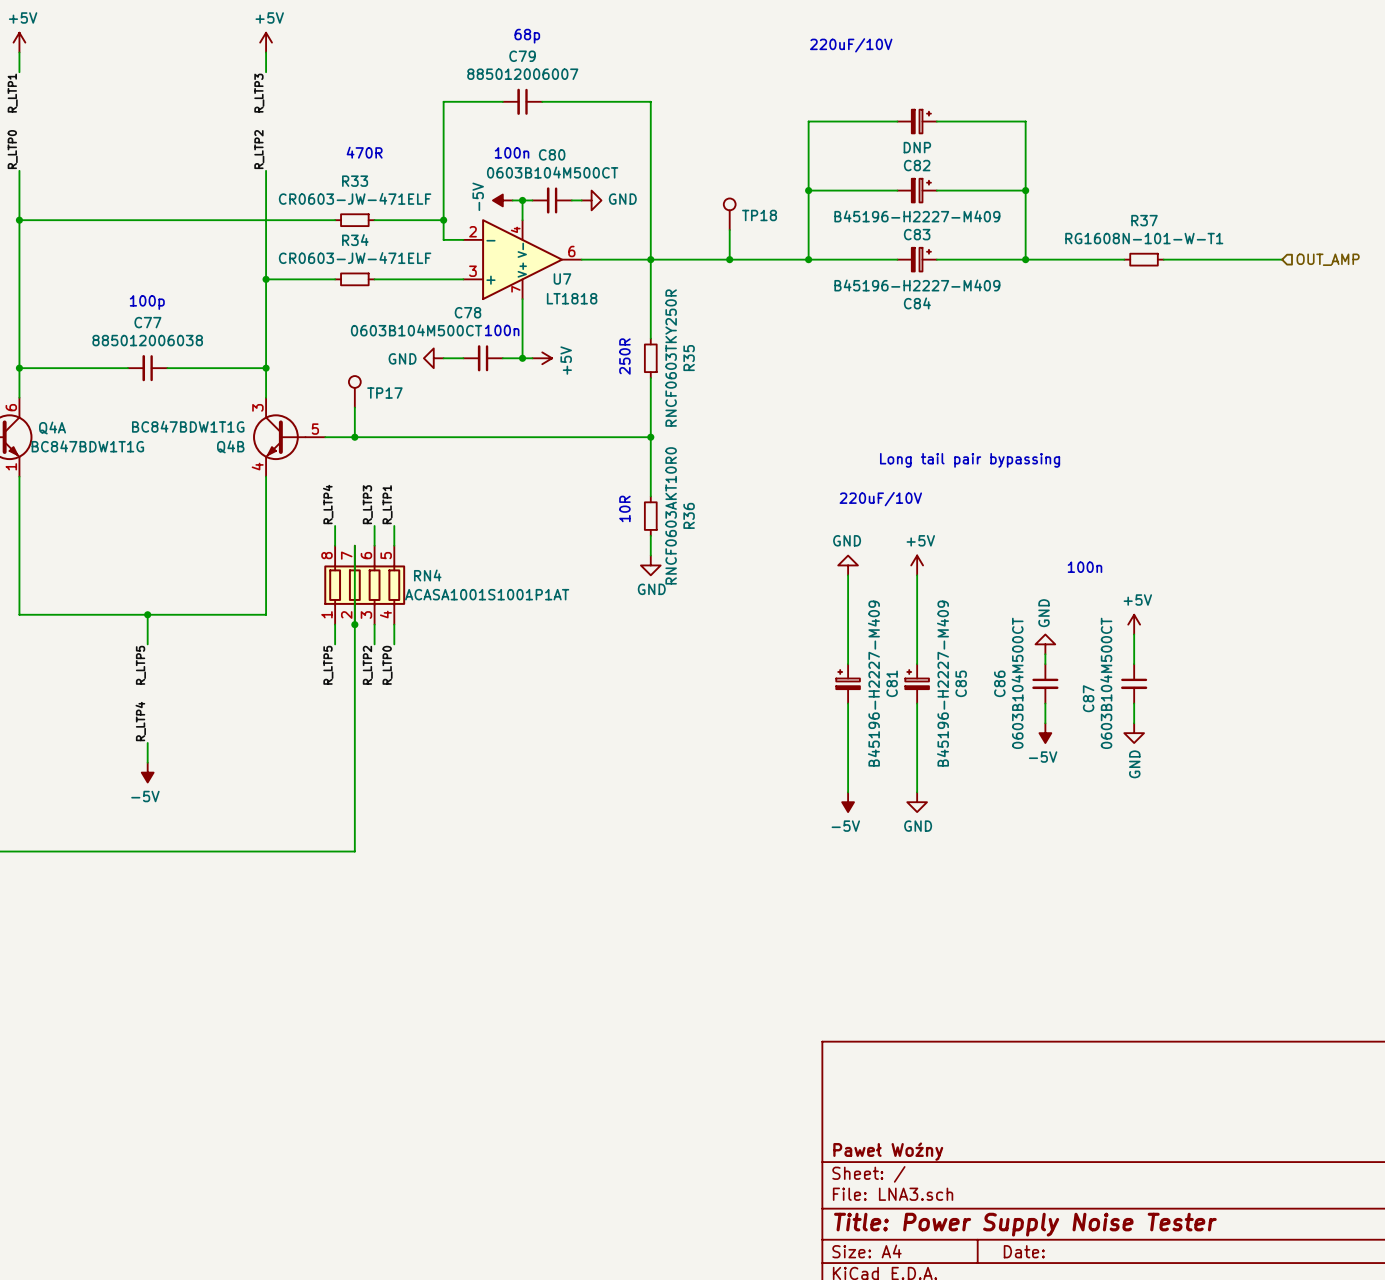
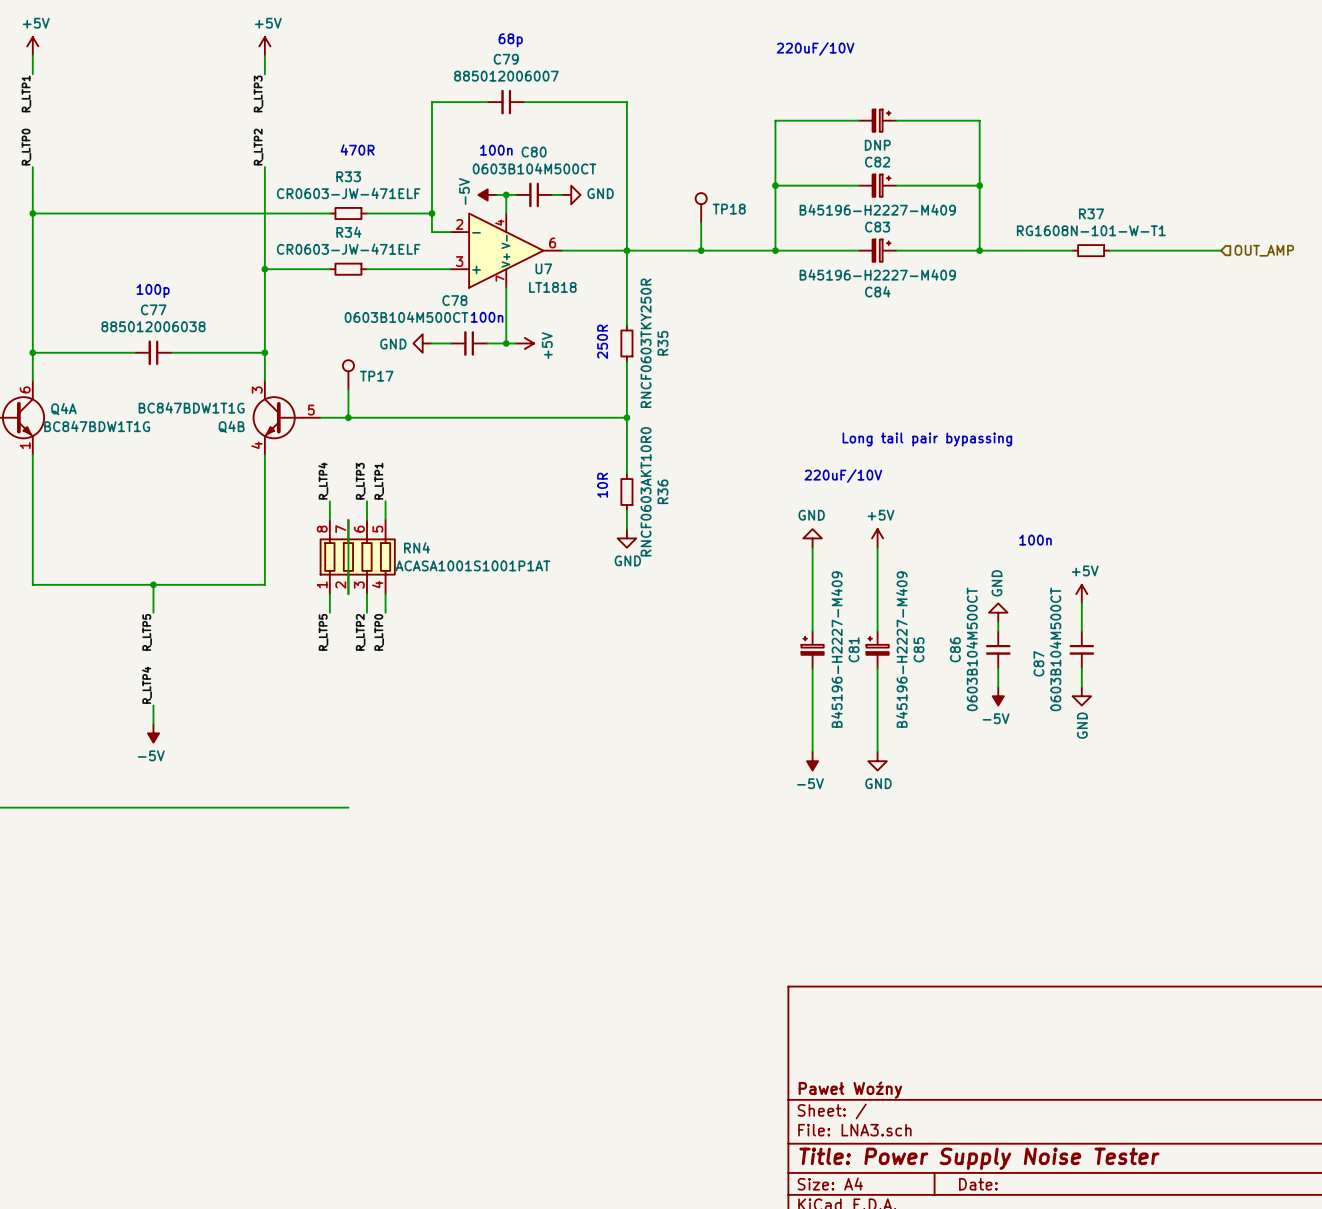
wire: (354, 624) (354, 851) -> none
junction: (354, 624) -> none

